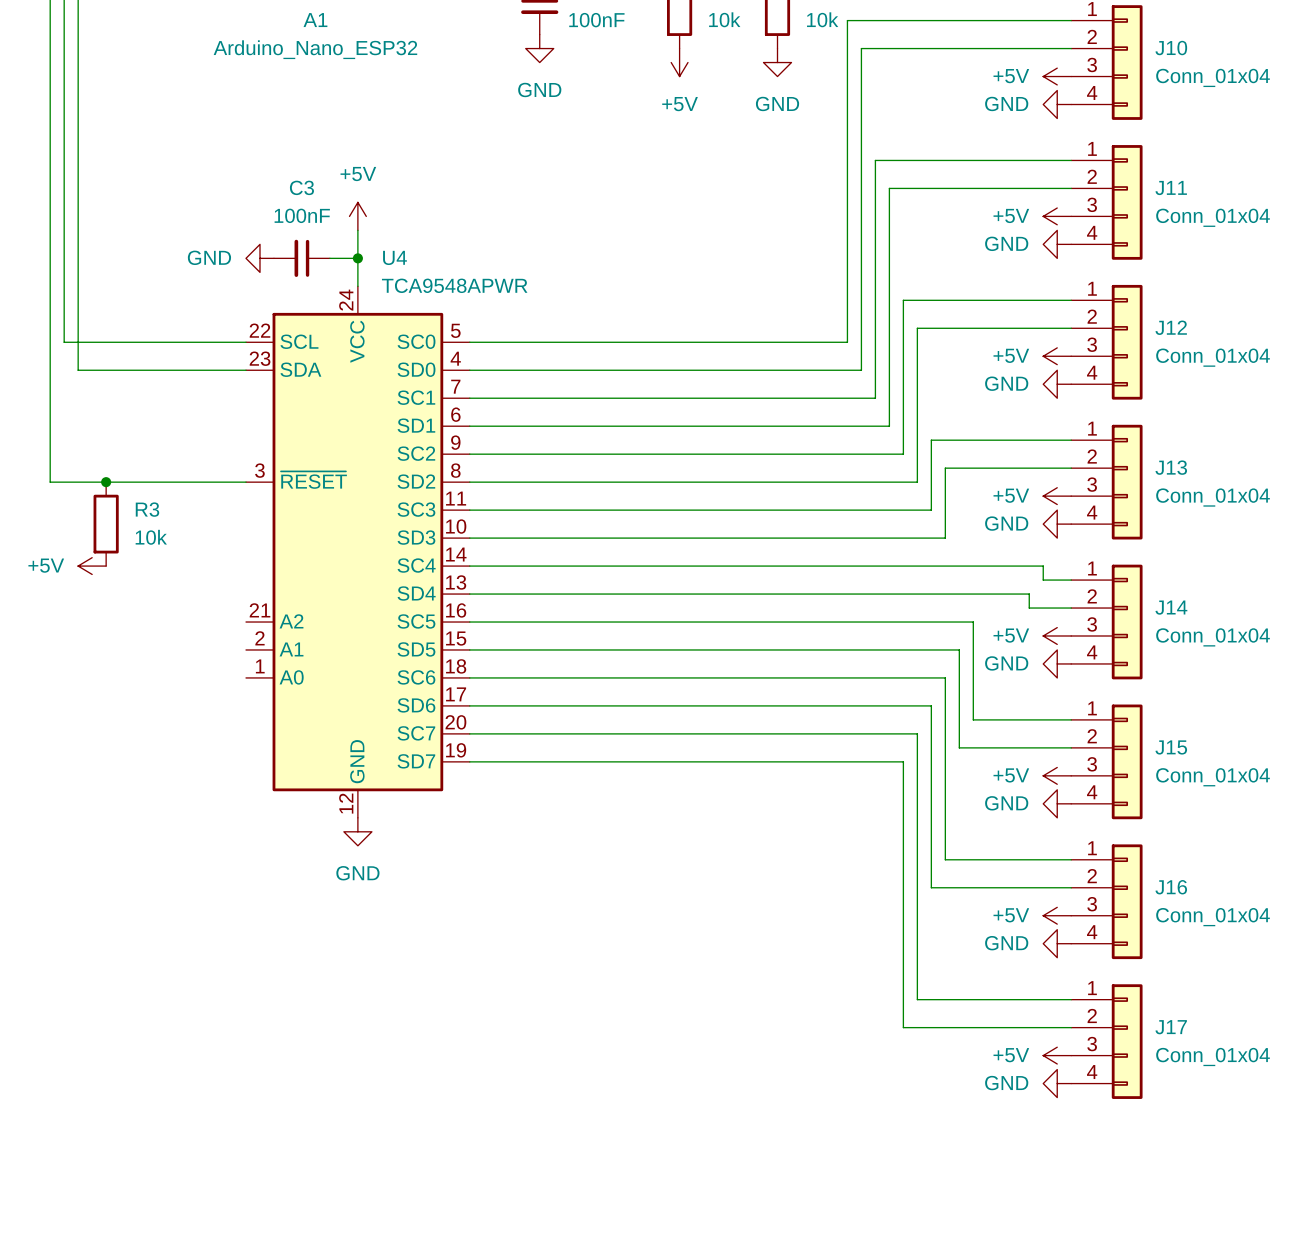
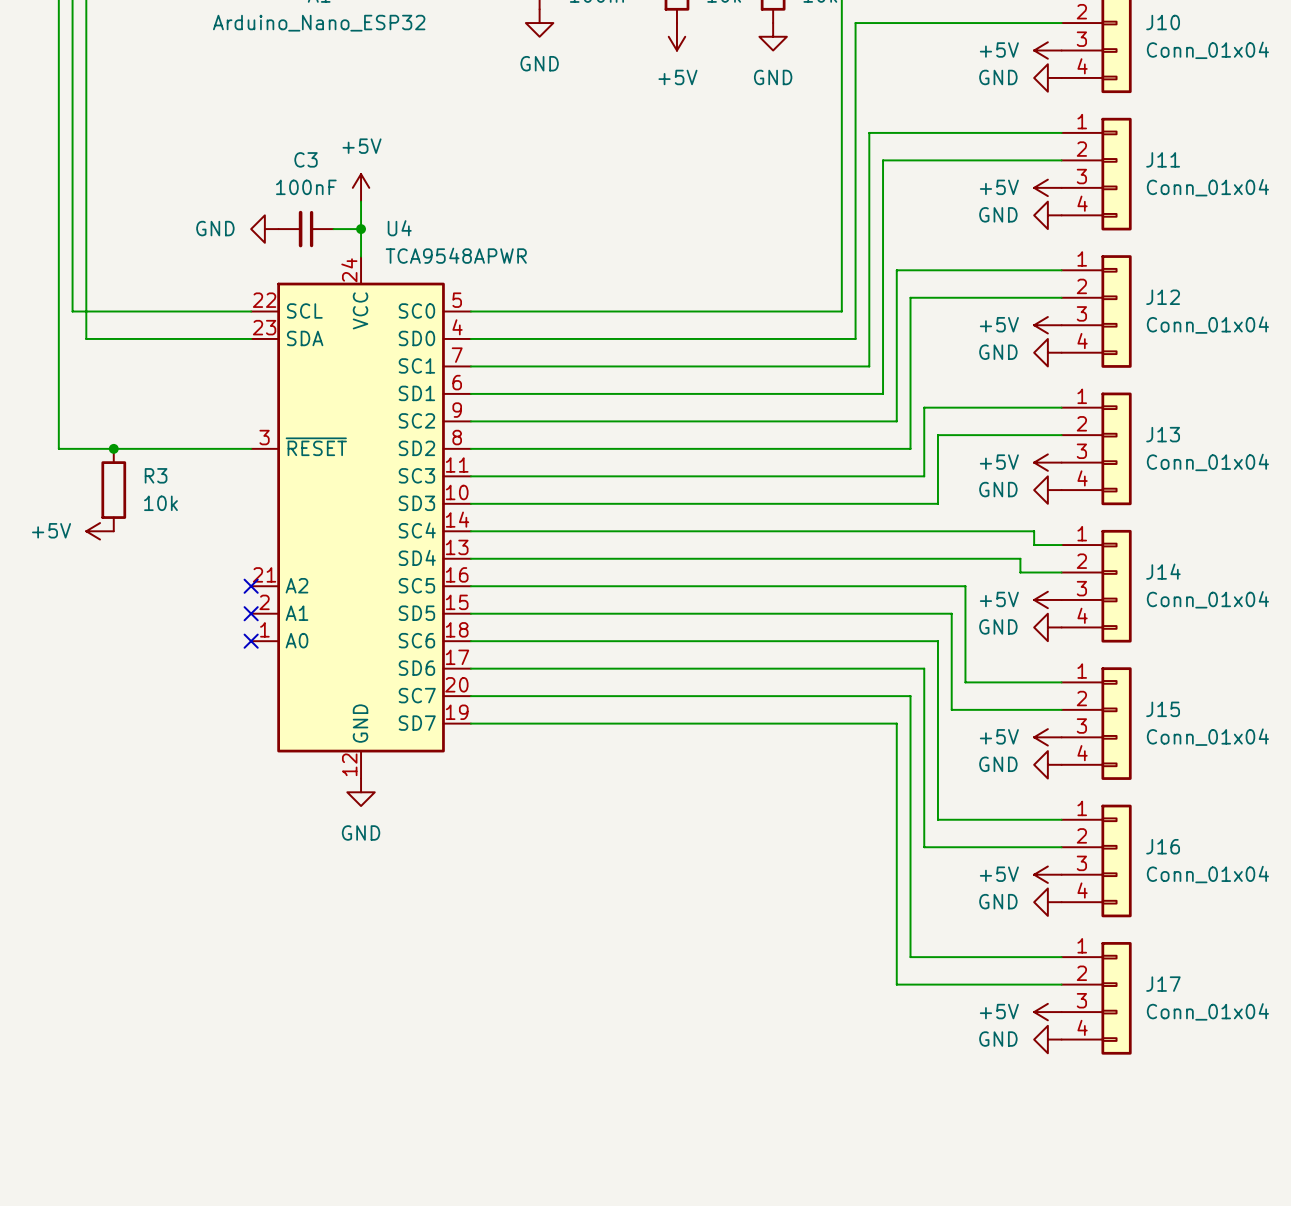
no-connect mark: none -> (251, 586)
no-connect mark: none -> (251, 613)
no-connect mark: none -> (251, 641)

